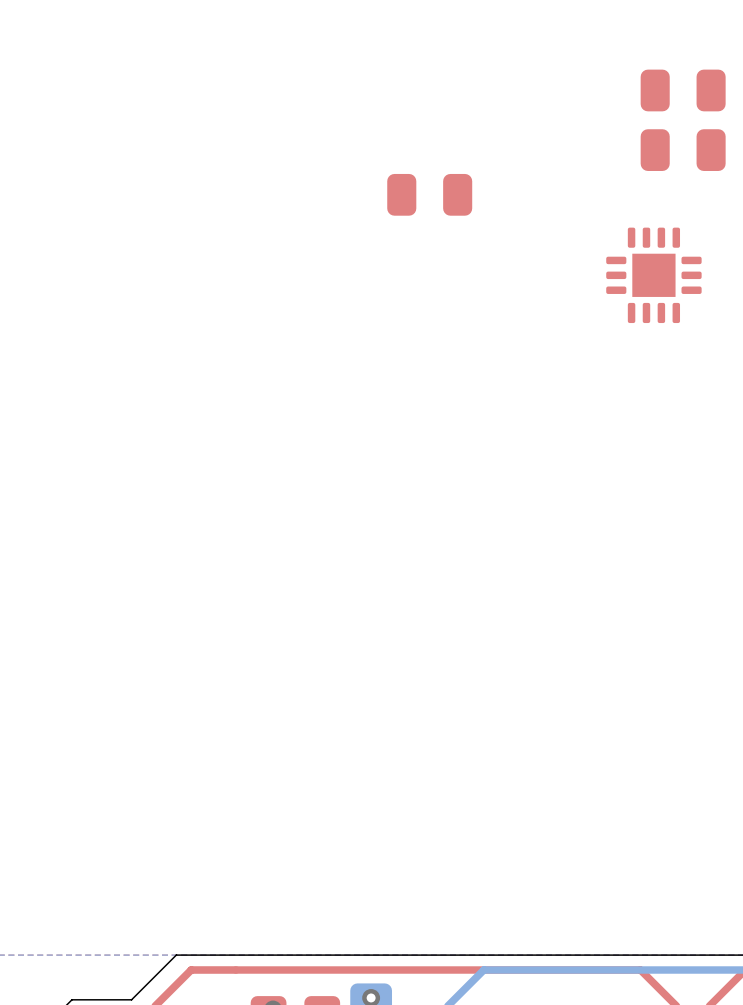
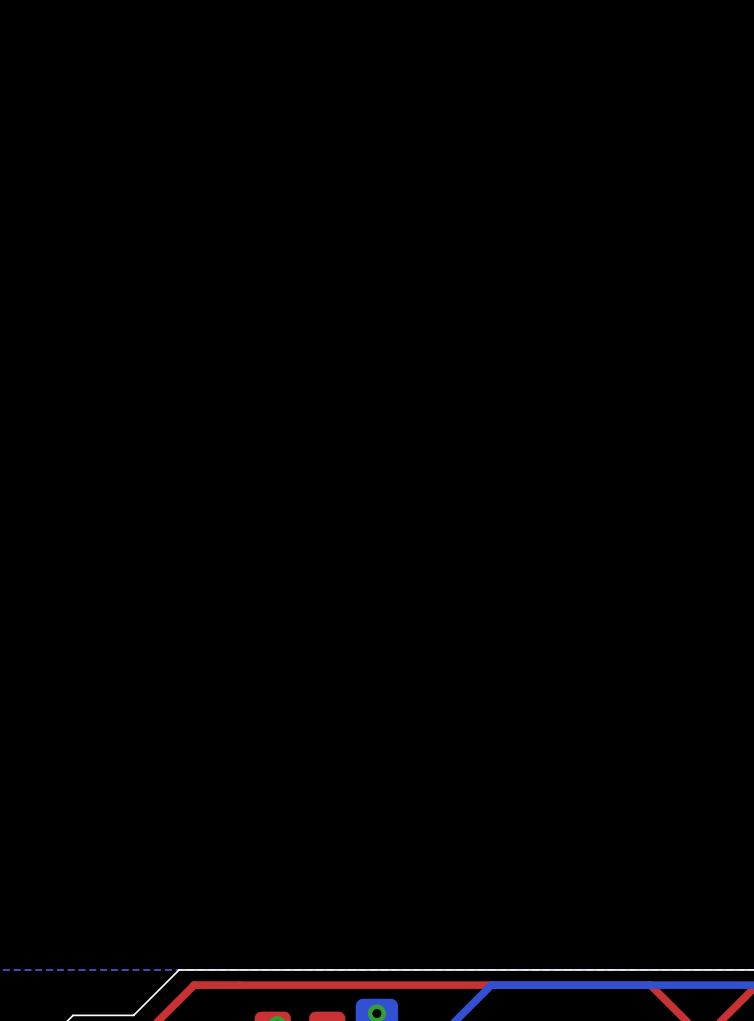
part: (683, 90) -> none
part: (683, 150) -> none
part: (429, 194) -> none
part: (653, 275) -> none

